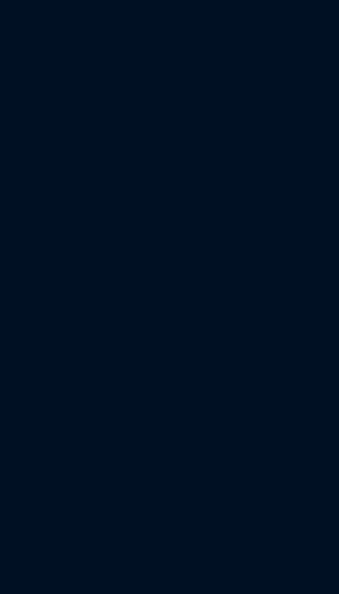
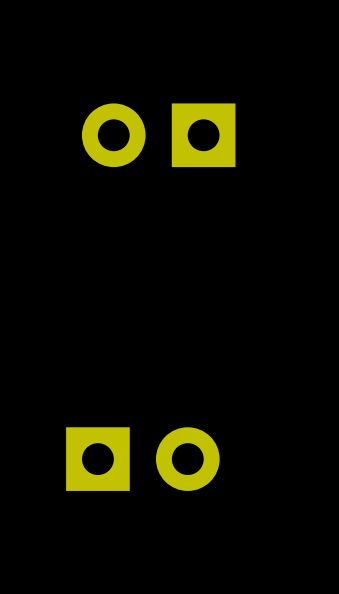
part: none -> (158, 135)
part: none -> (142, 459)

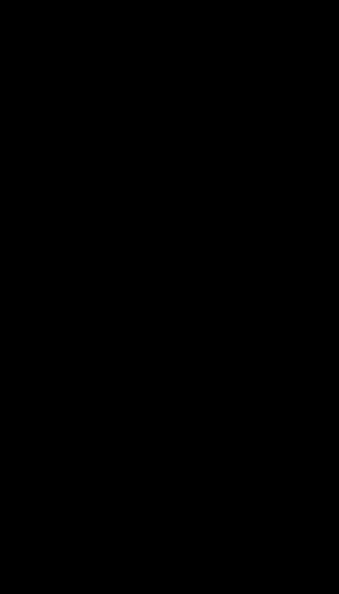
part: (158, 135) -> none
part: (142, 459) -> none

